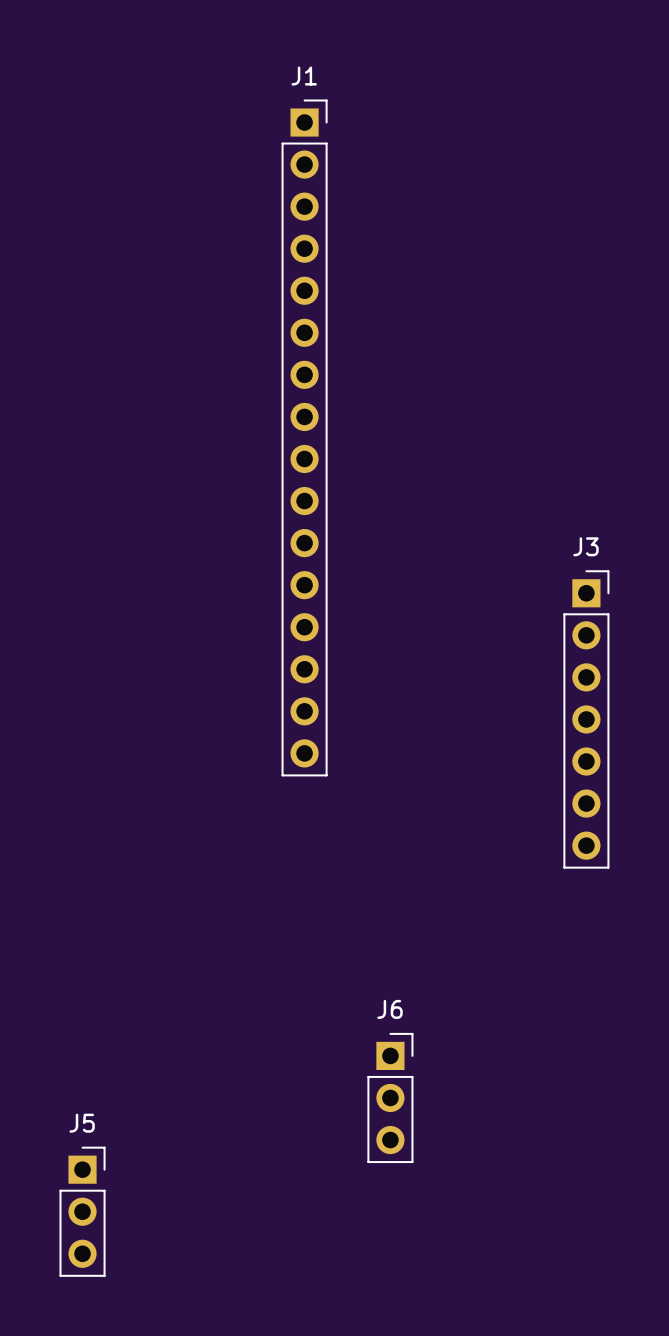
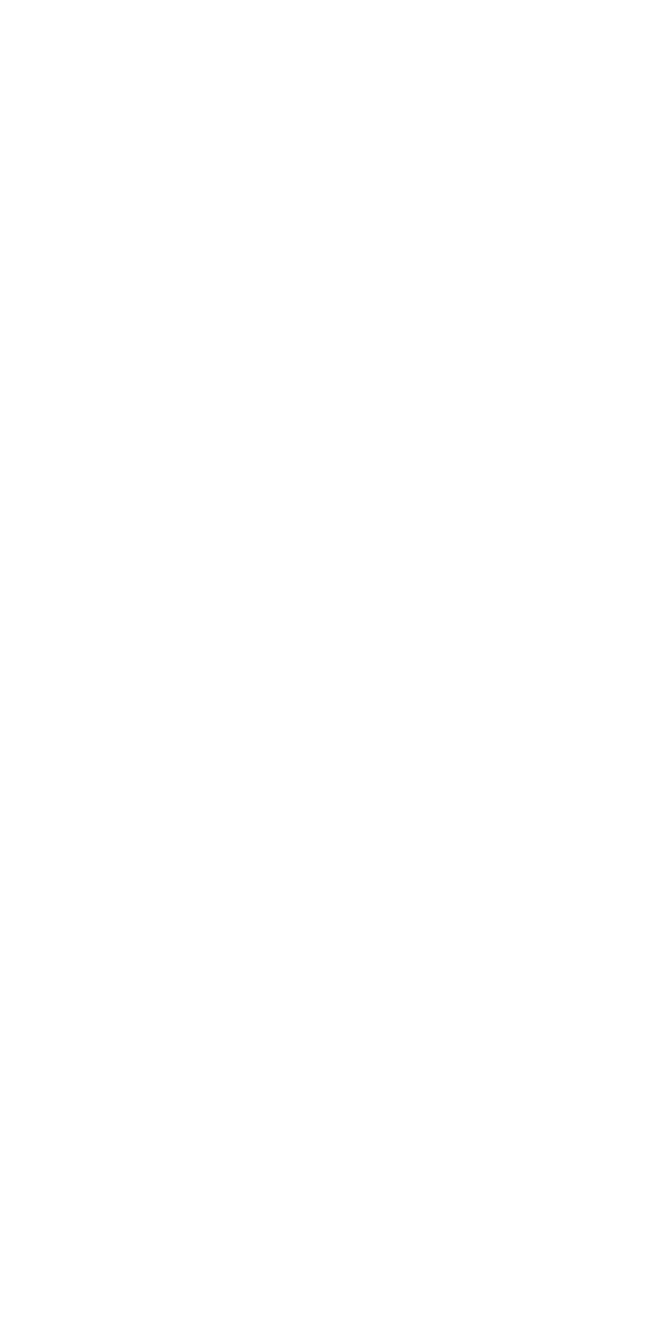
J1: (304, 437) -> none
J3: (586, 719) -> none
J6: (390, 1097) -> none
J5: (82, 1211) -> none

